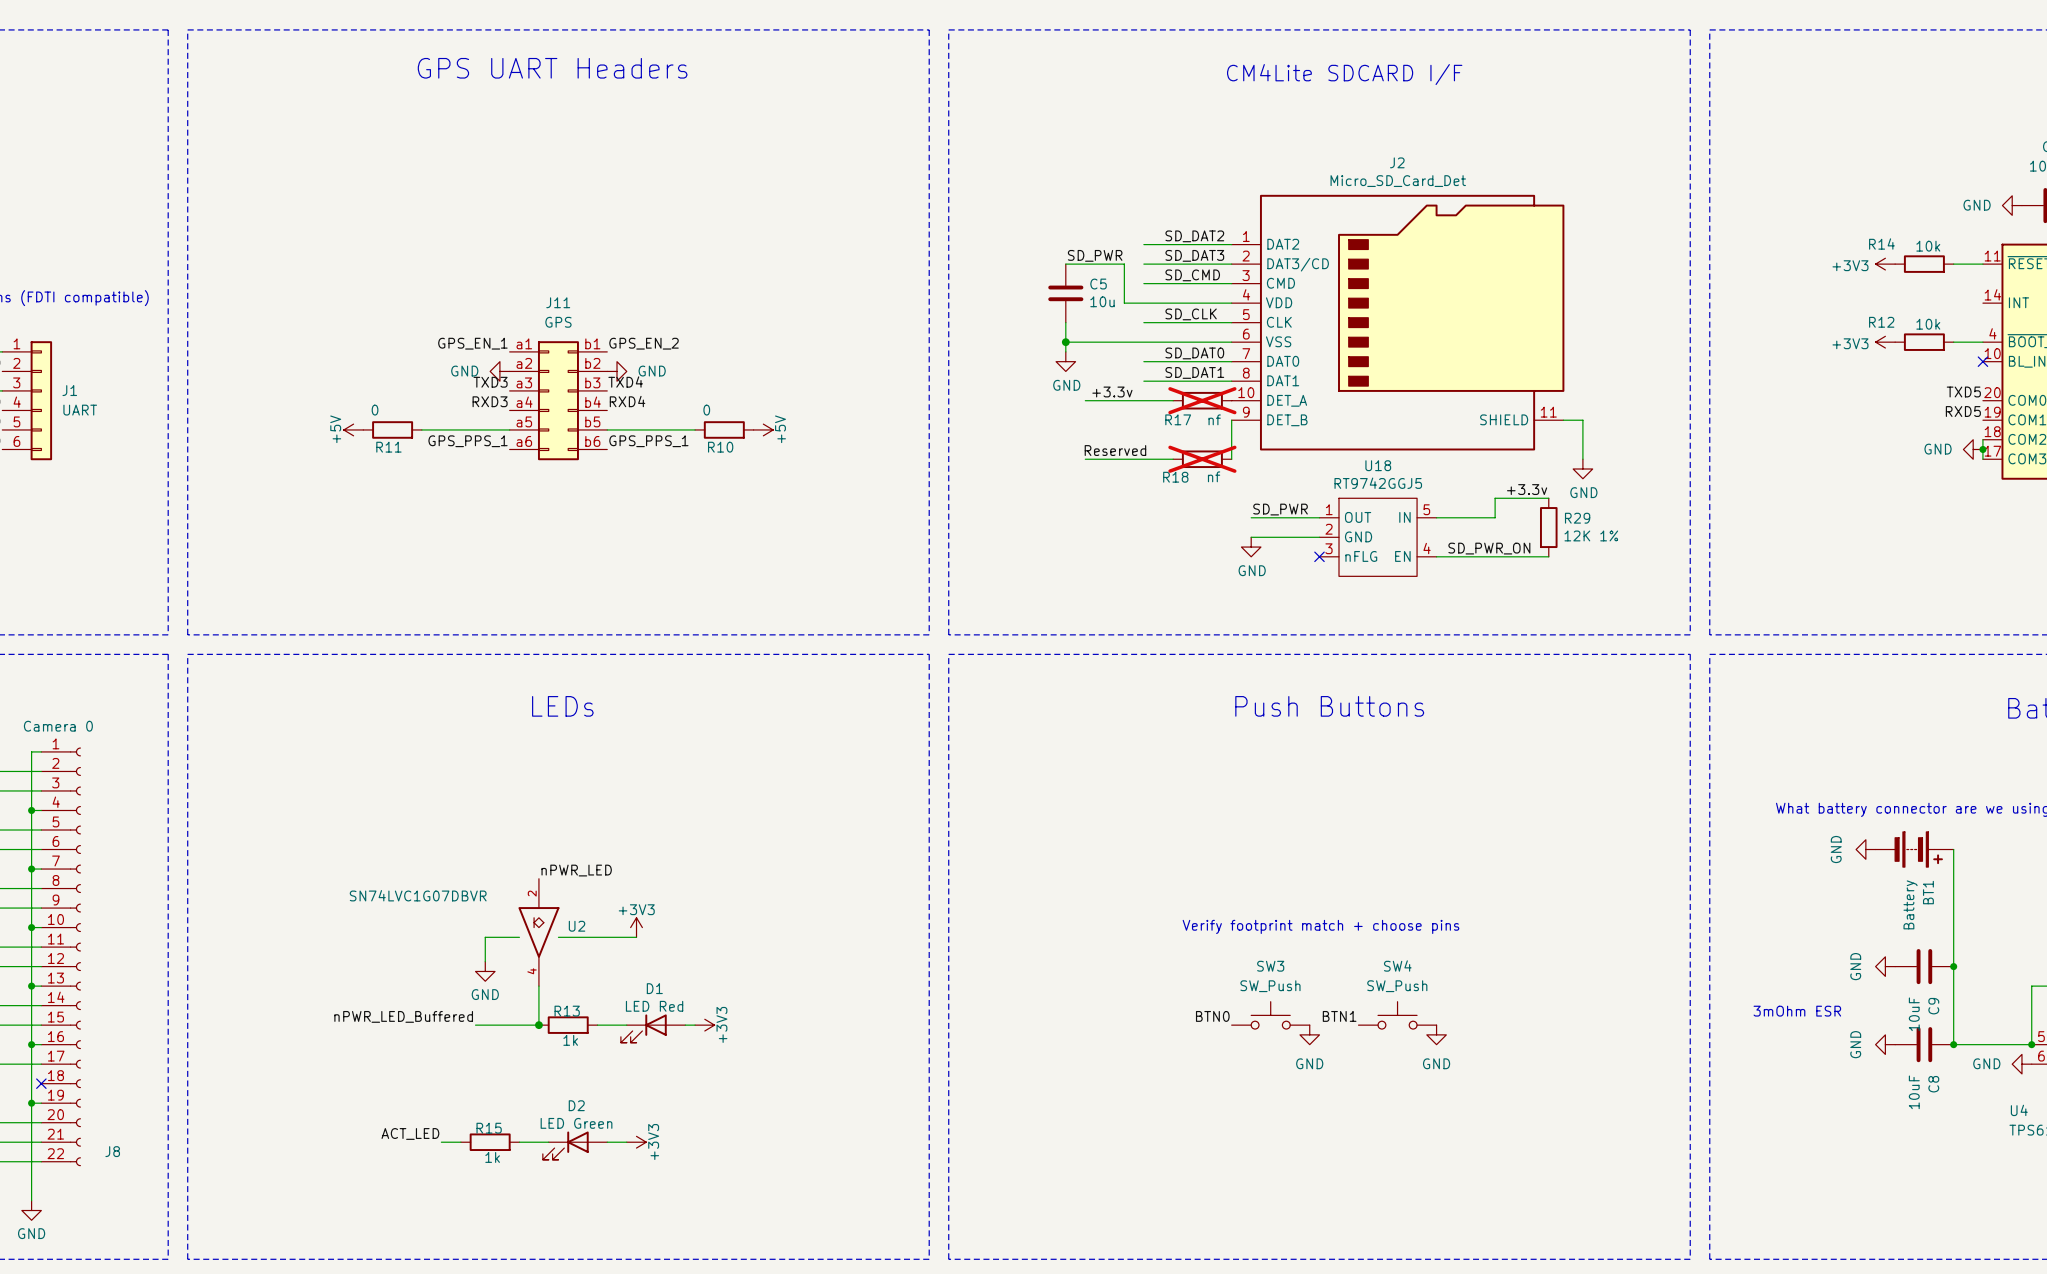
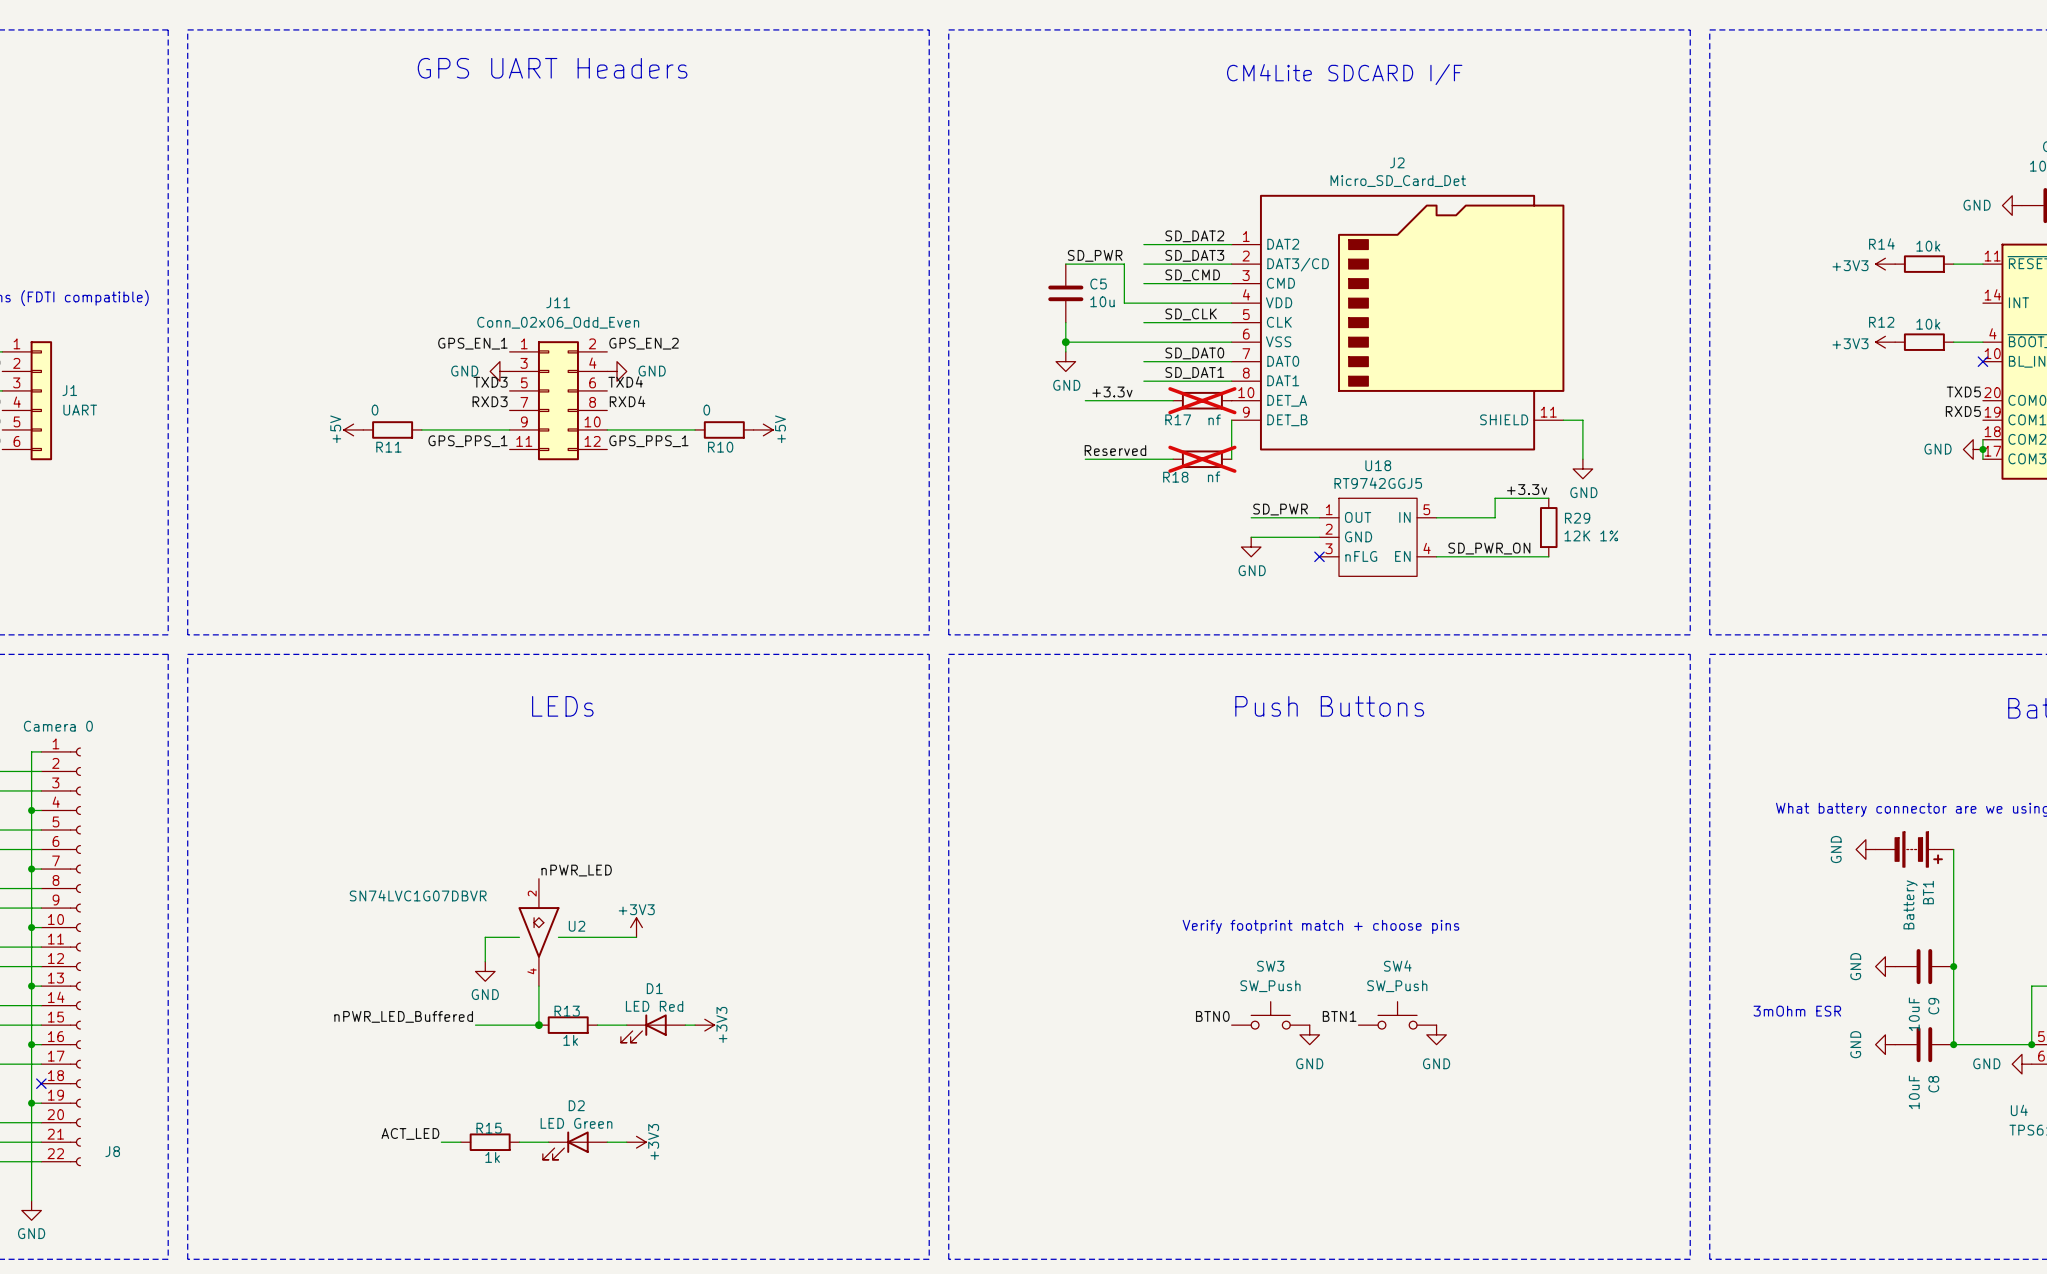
J11 value: GPS (558, 322) -> Conn_02x06_Odd_Even (558, 322)
J11 symbol: [509, 341, 608, 461] -> [509, 341, 608, 461]

